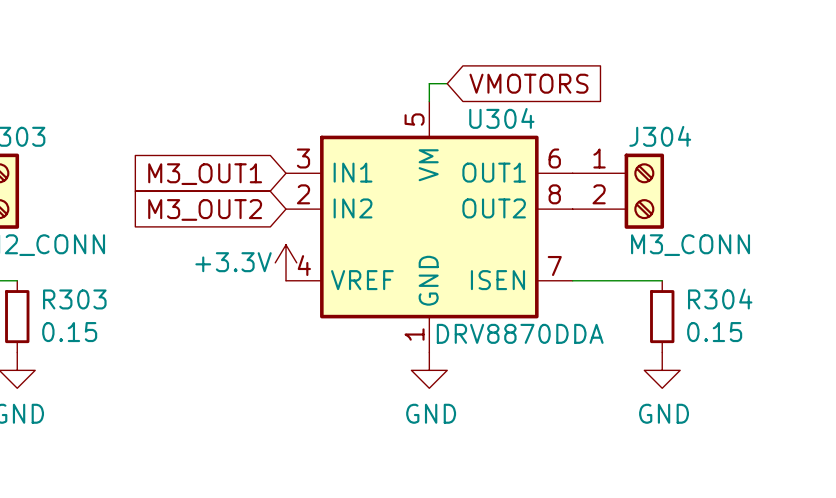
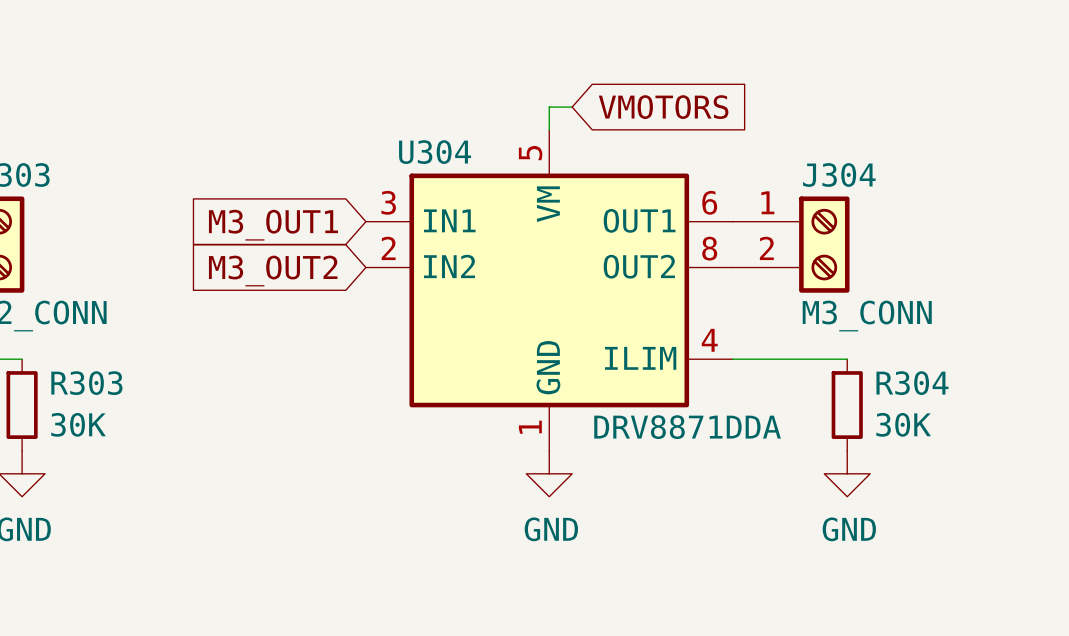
U304 symbol: [286, 101, 573, 353] -> [365, 130, 733, 451]
U304 name position: U304 (501, 118) -> U304 (435, 152)
power symbol: +3.3V (286, 262) -> none
R303 value: 0.15 (69, 332) -> 30K (78, 424)
R304 value: 0.15 (714, 332) -> 30K (903, 424)
U304 value: DRV8870DDA (520, 333) -> DRV8871DDA (687, 427)

